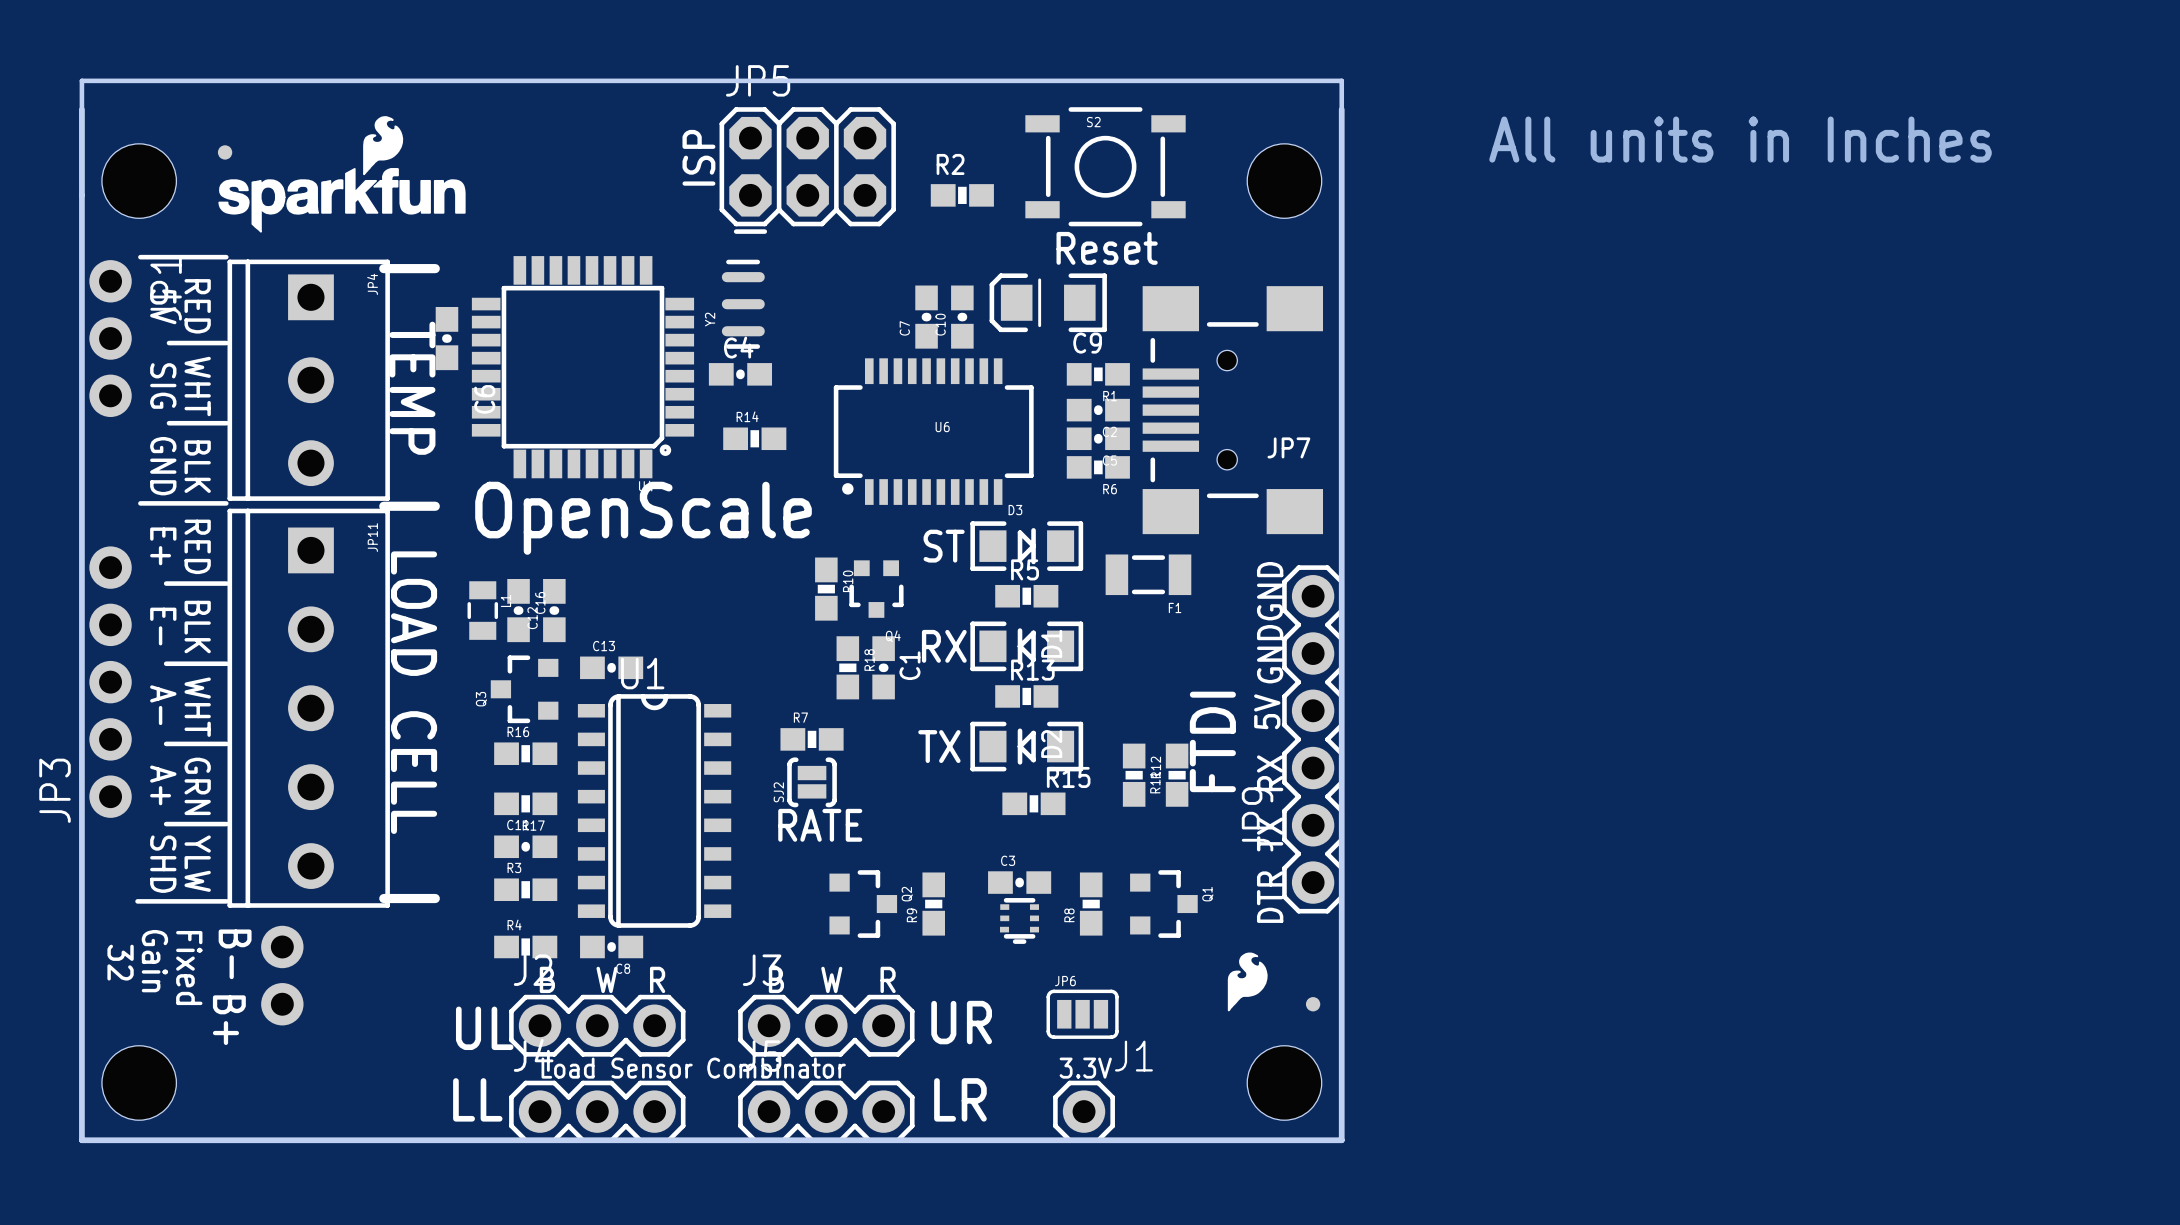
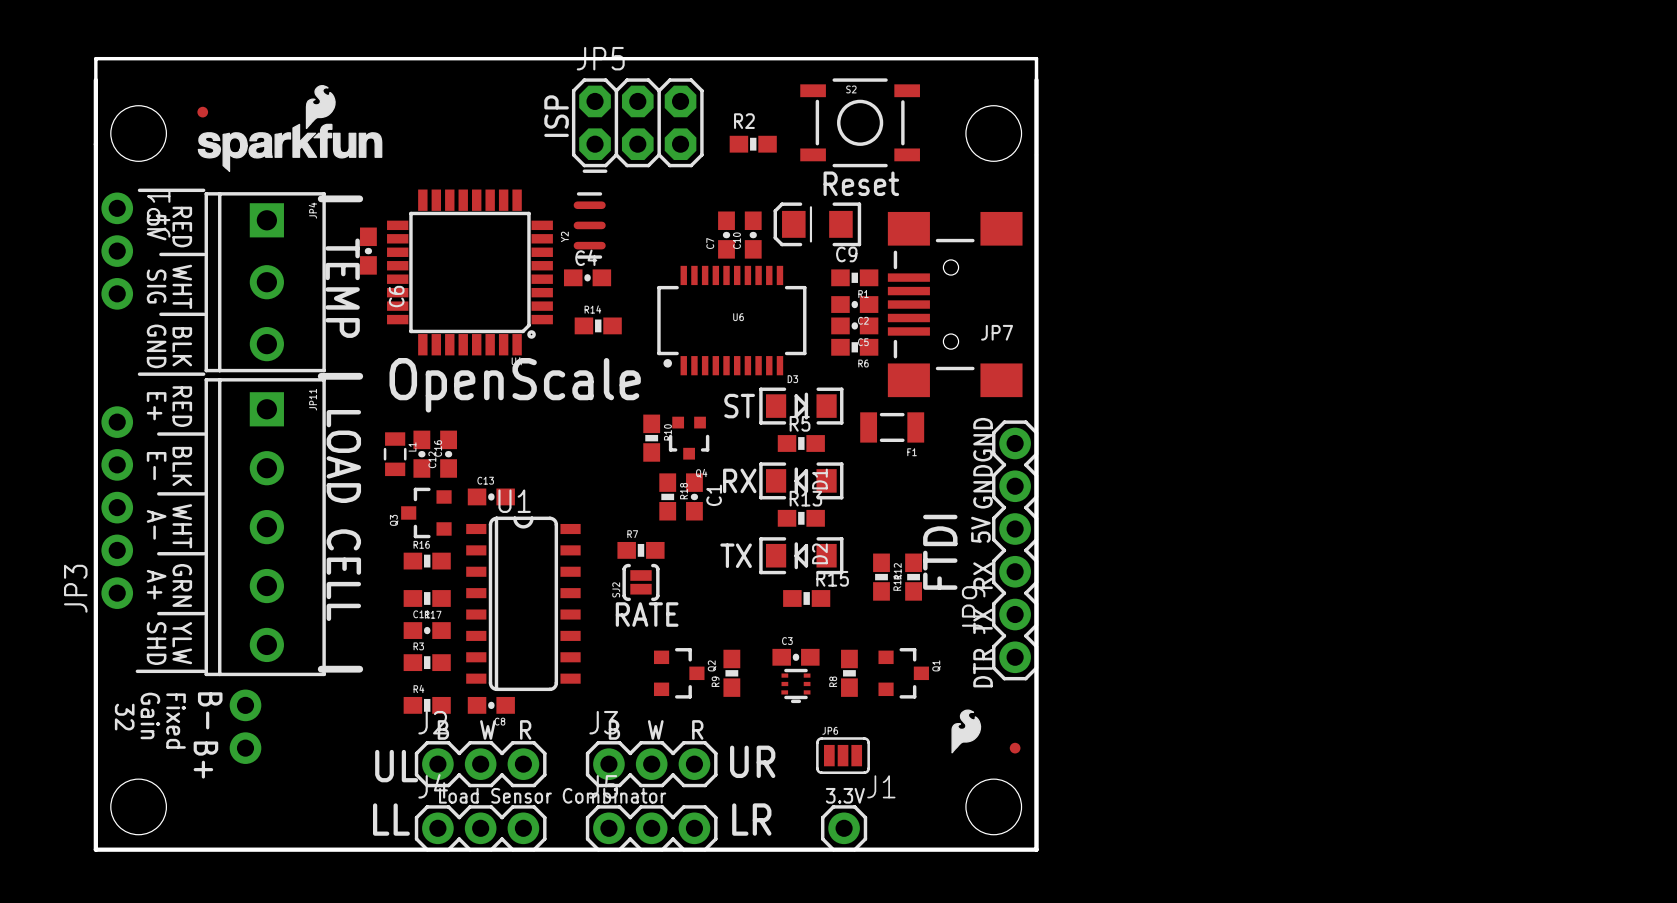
text: All units in Inches (1740, 139) -> none

